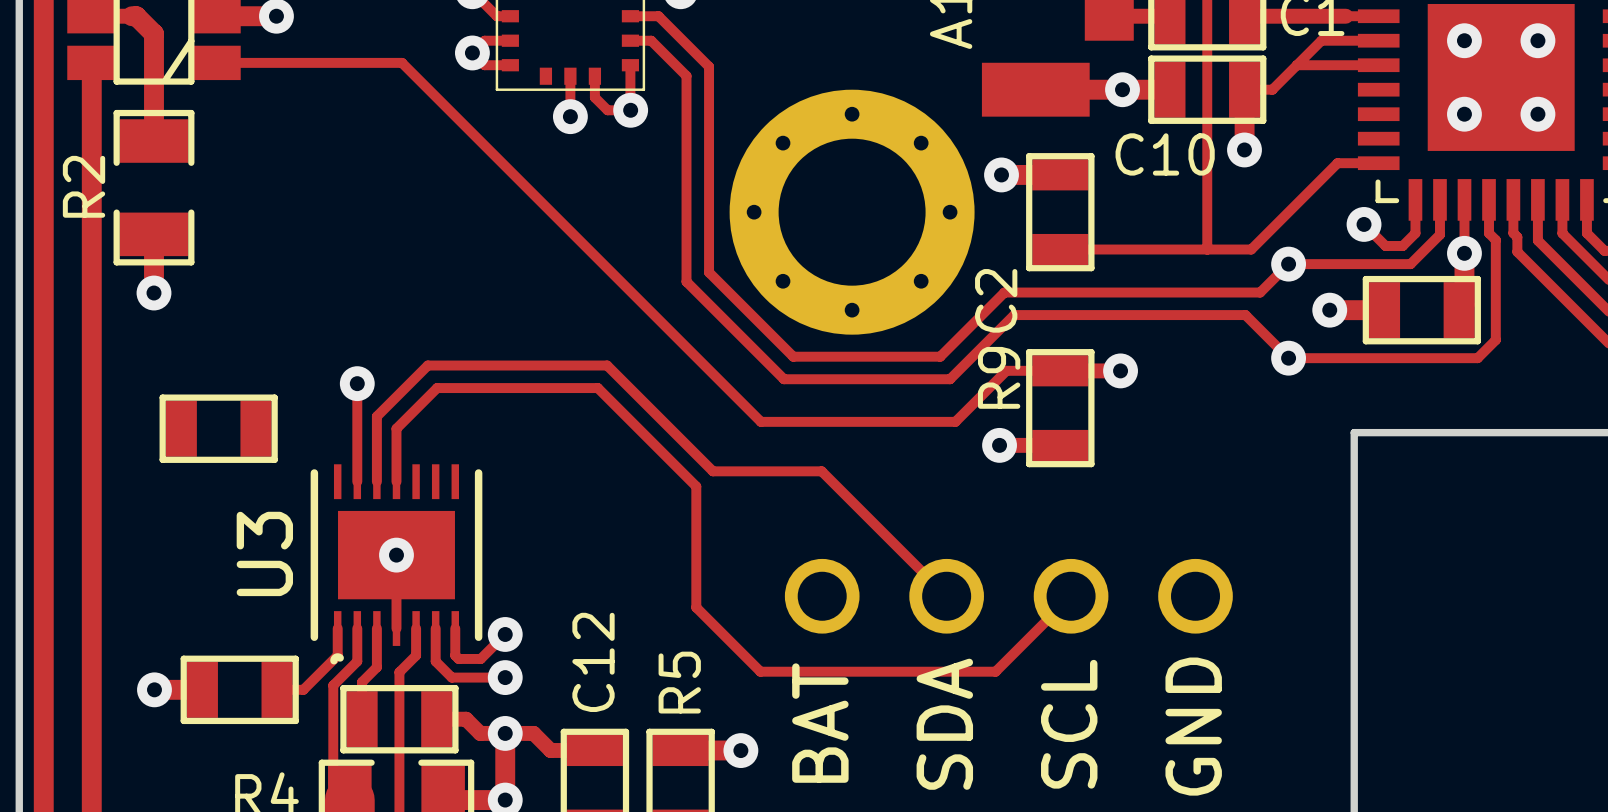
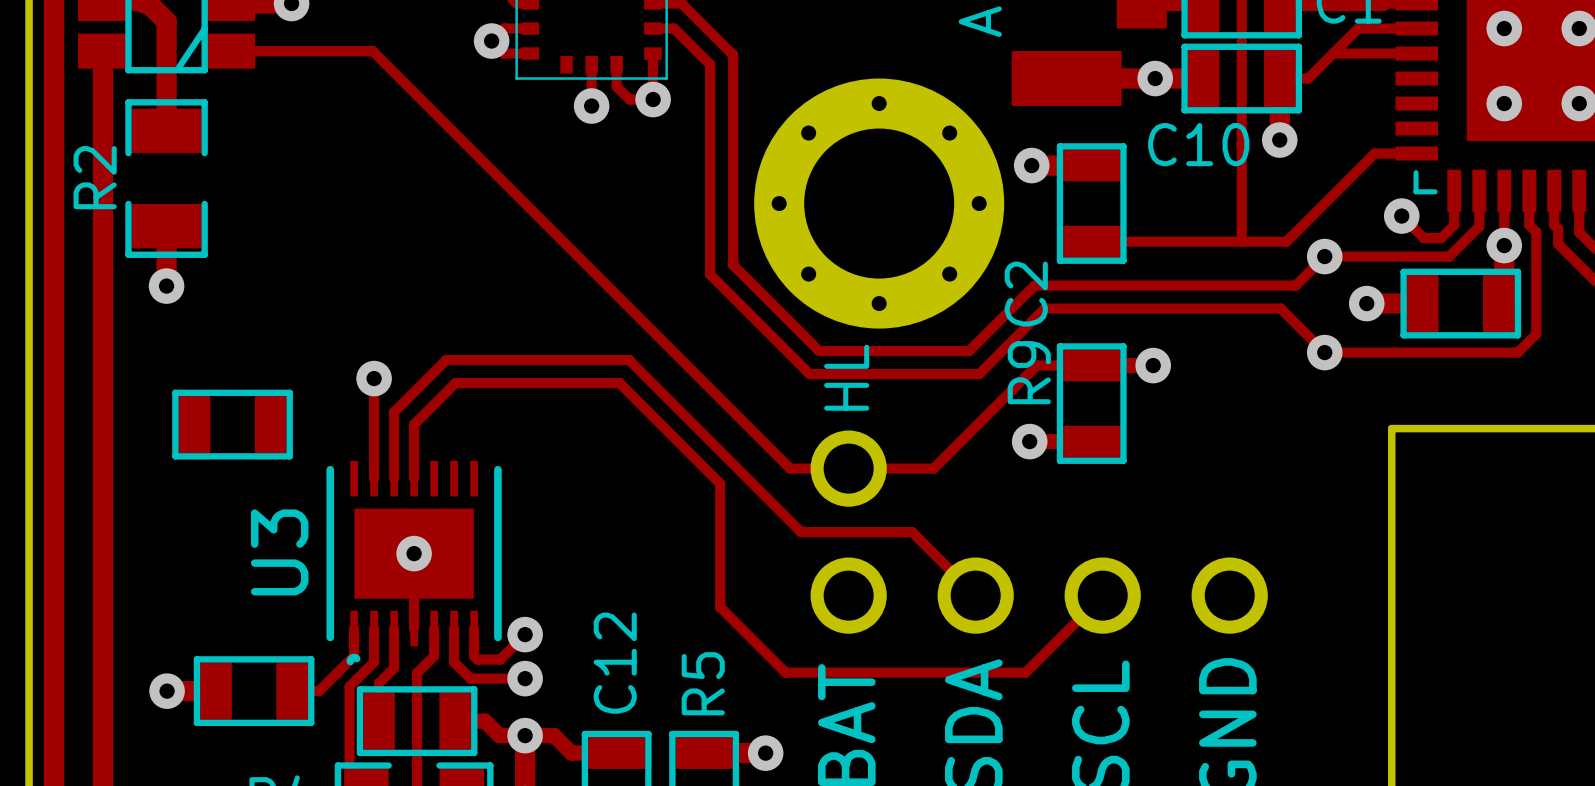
track: (355, 62) (402, 62) (760, 421) (955, 421) -> (372, 51) (790, 468) (933, 468) (984, 417)
text: none -> HL (846, 377)
track: (712, 471) (821, 471) (884, 534) -> (737, 468) (801, 532) (912, 532)
part: none -> (848, 468)

